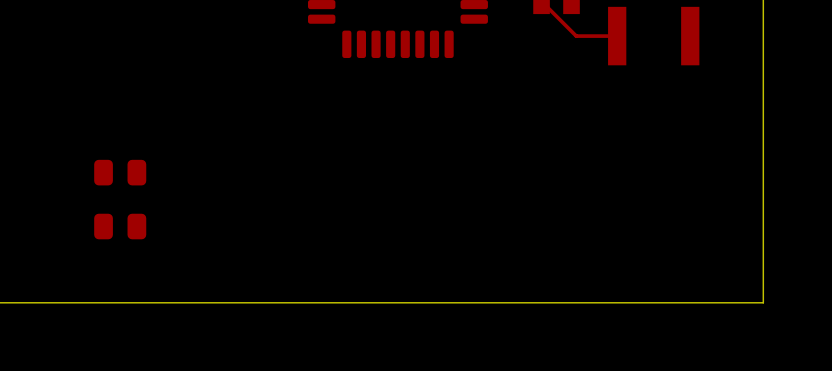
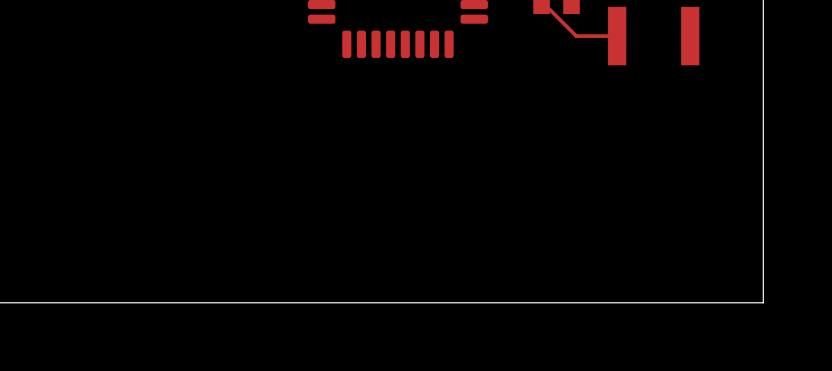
part: (120, 172) -> none
part: (120, 226) -> none

